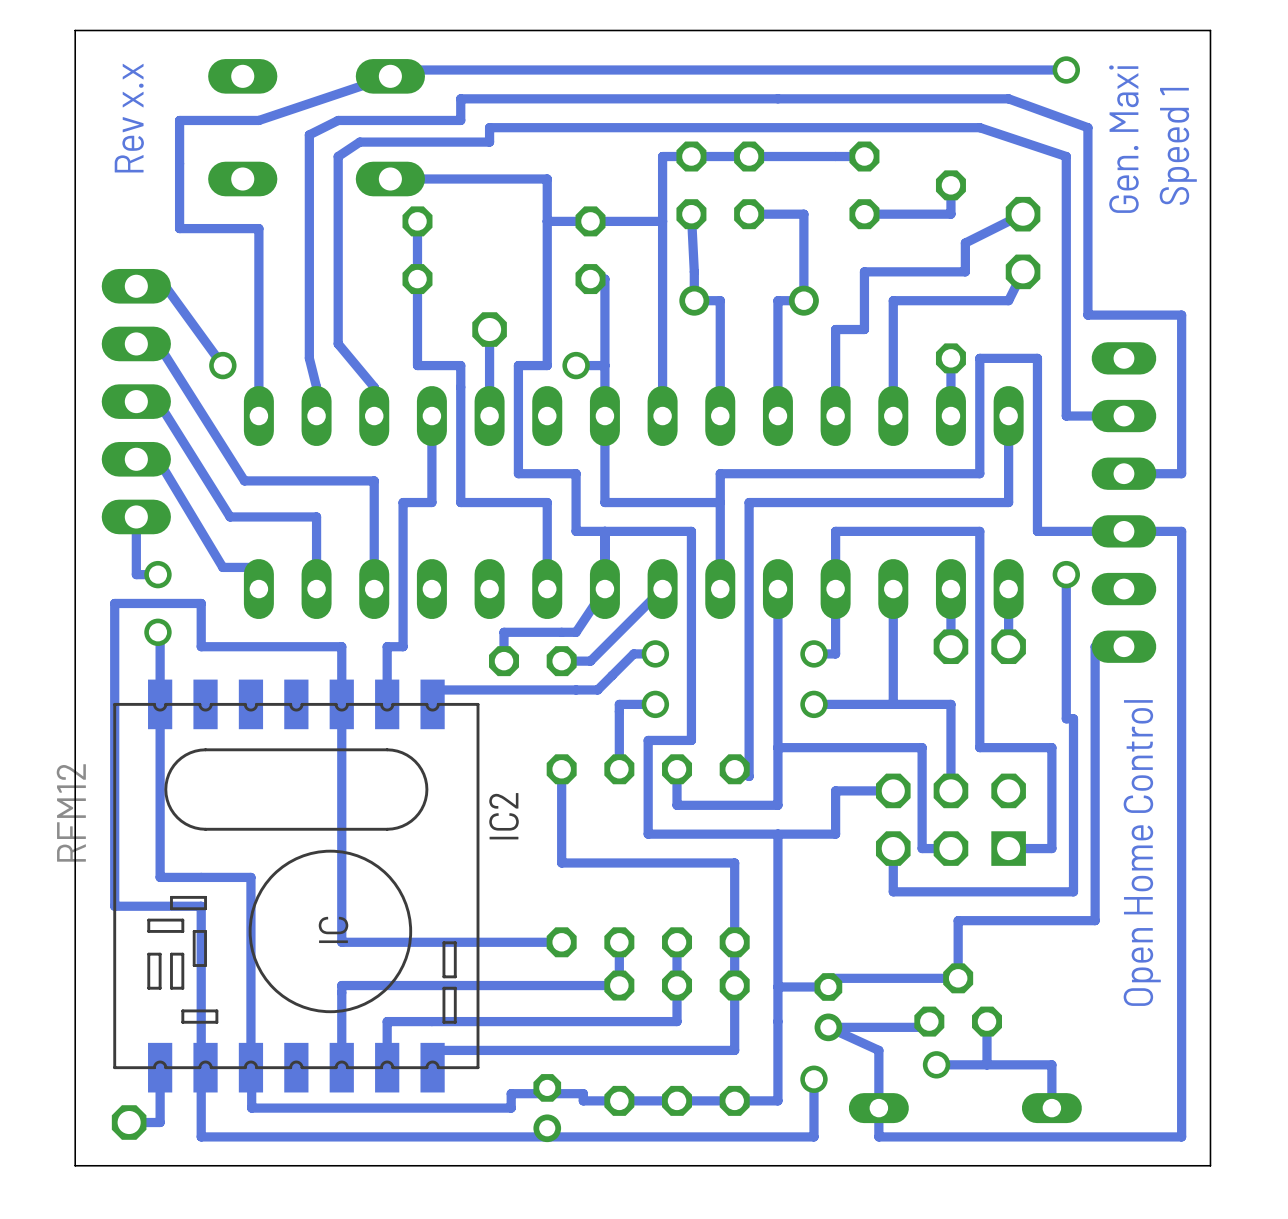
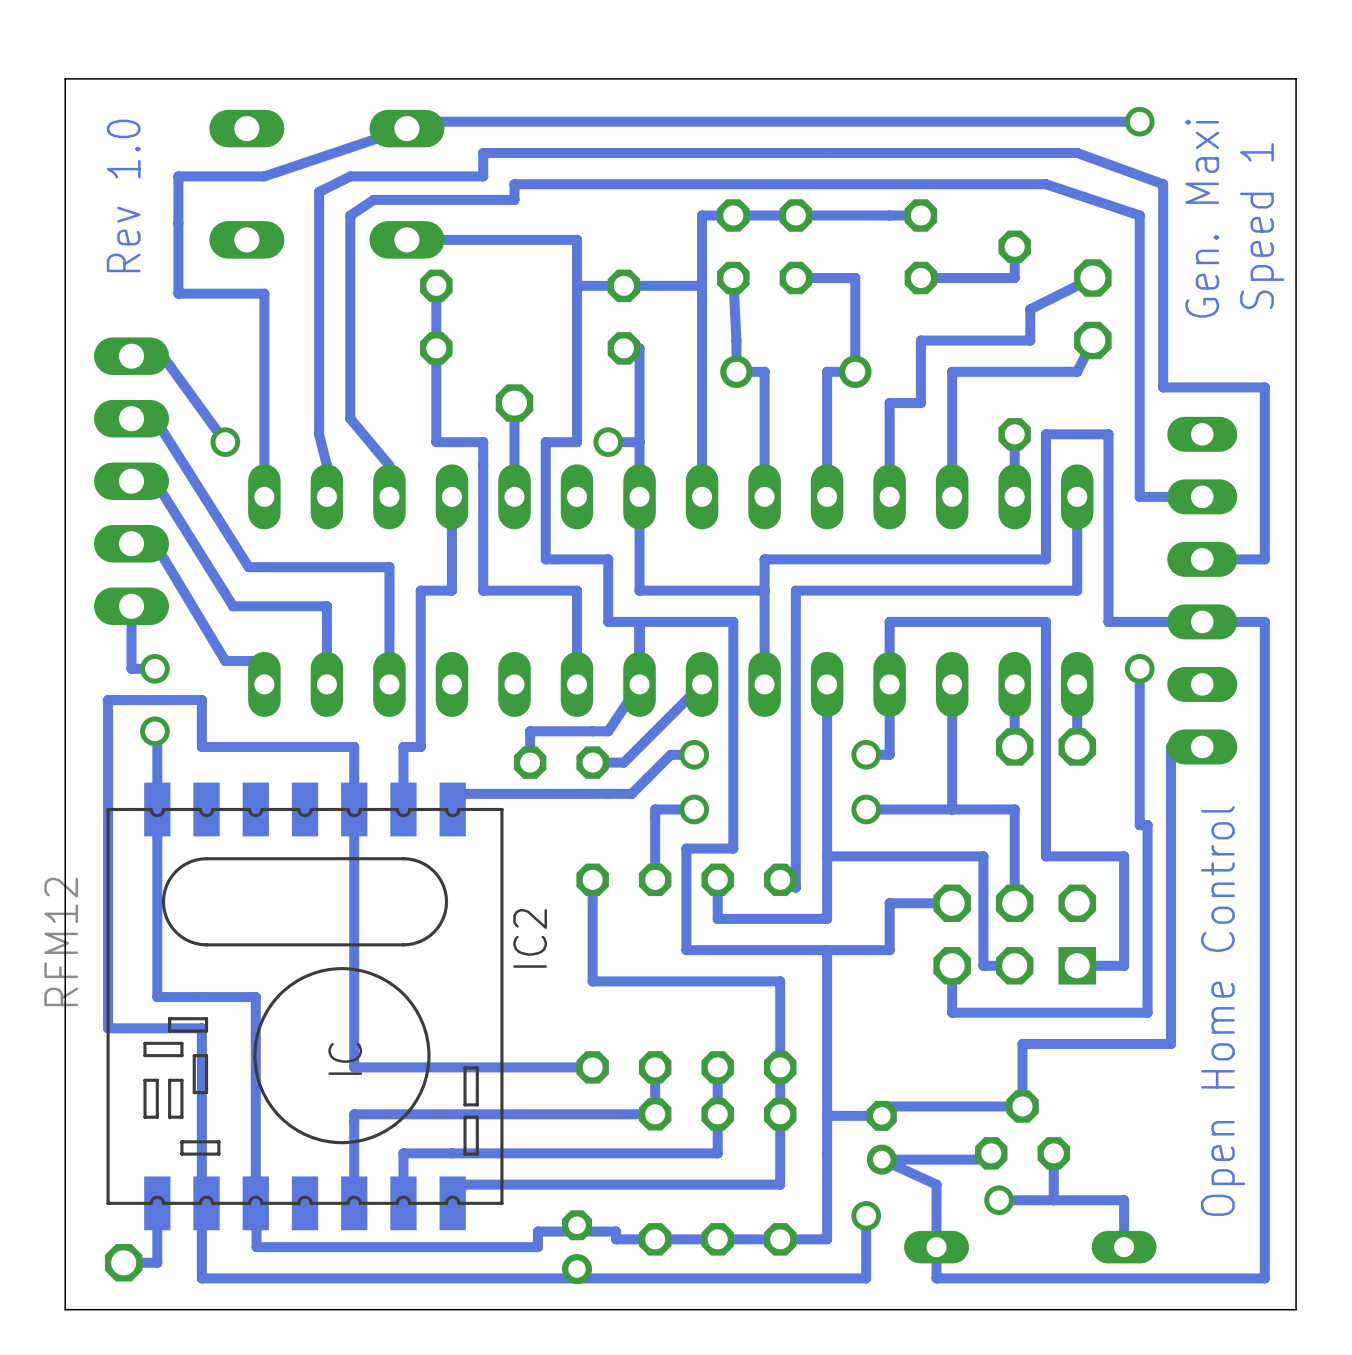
text: Rev x.x (129, 118) -> Rev 1.0 (123, 195)

